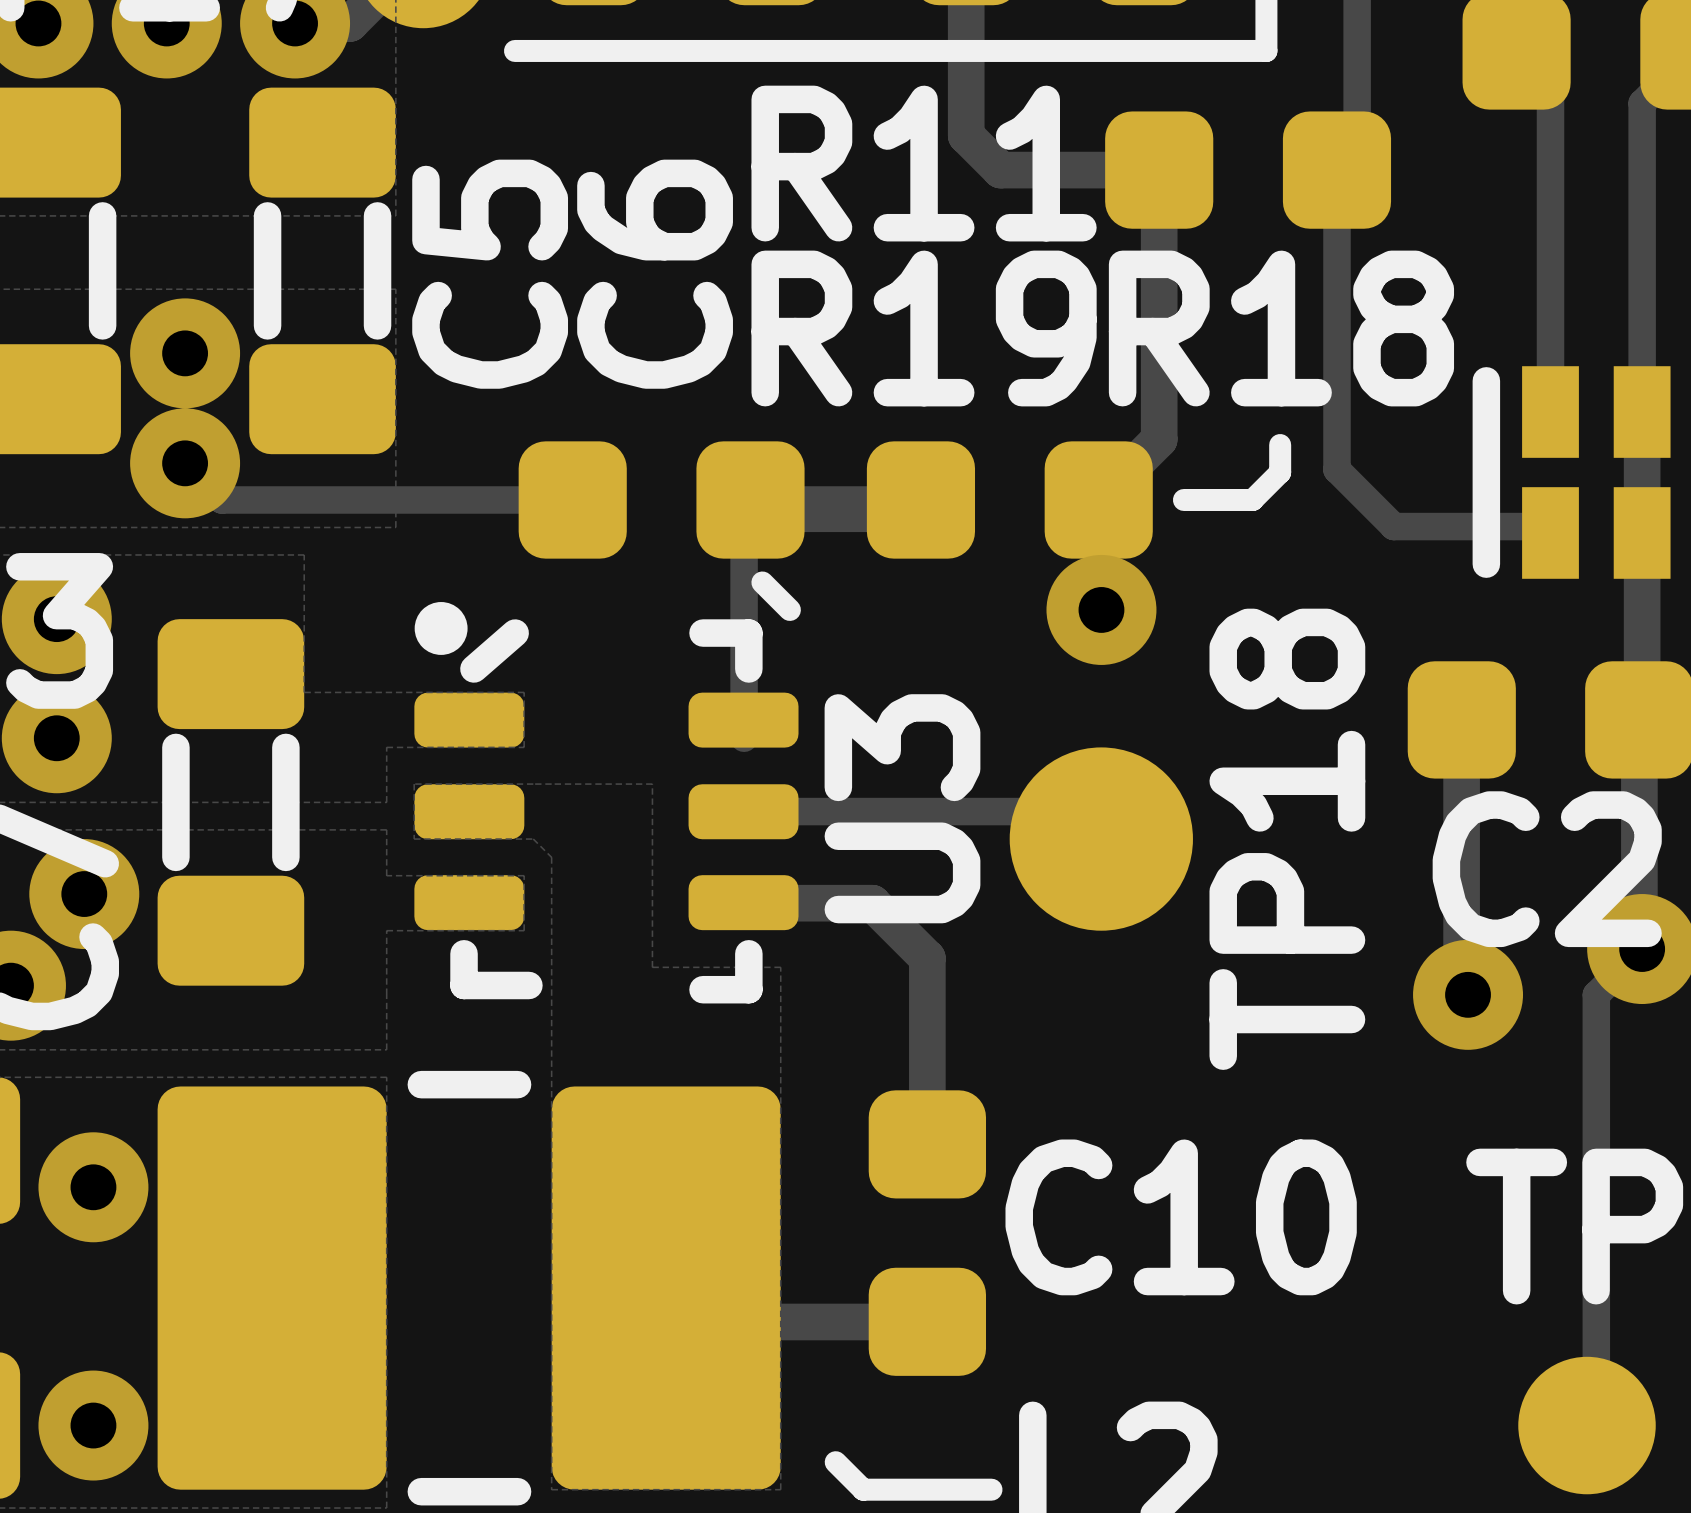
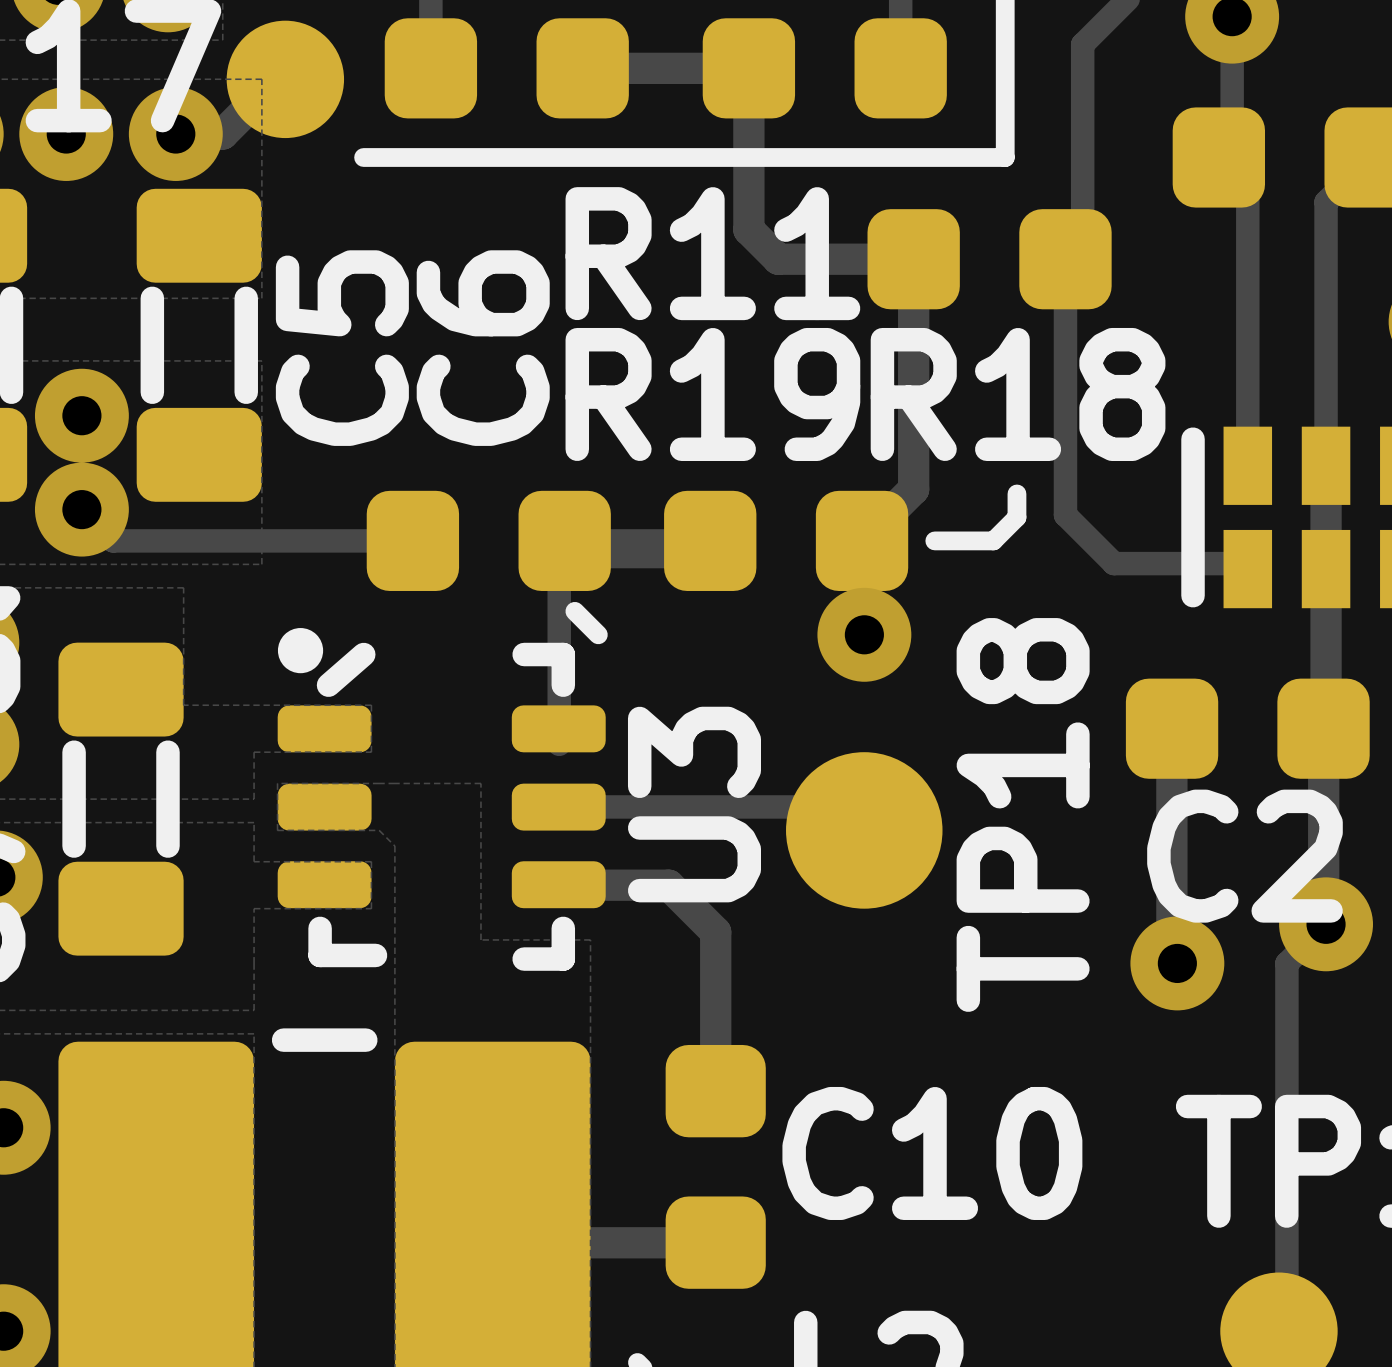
TP18 name position: TP18 (1287, 839) -> TP18 (1023, 814)

